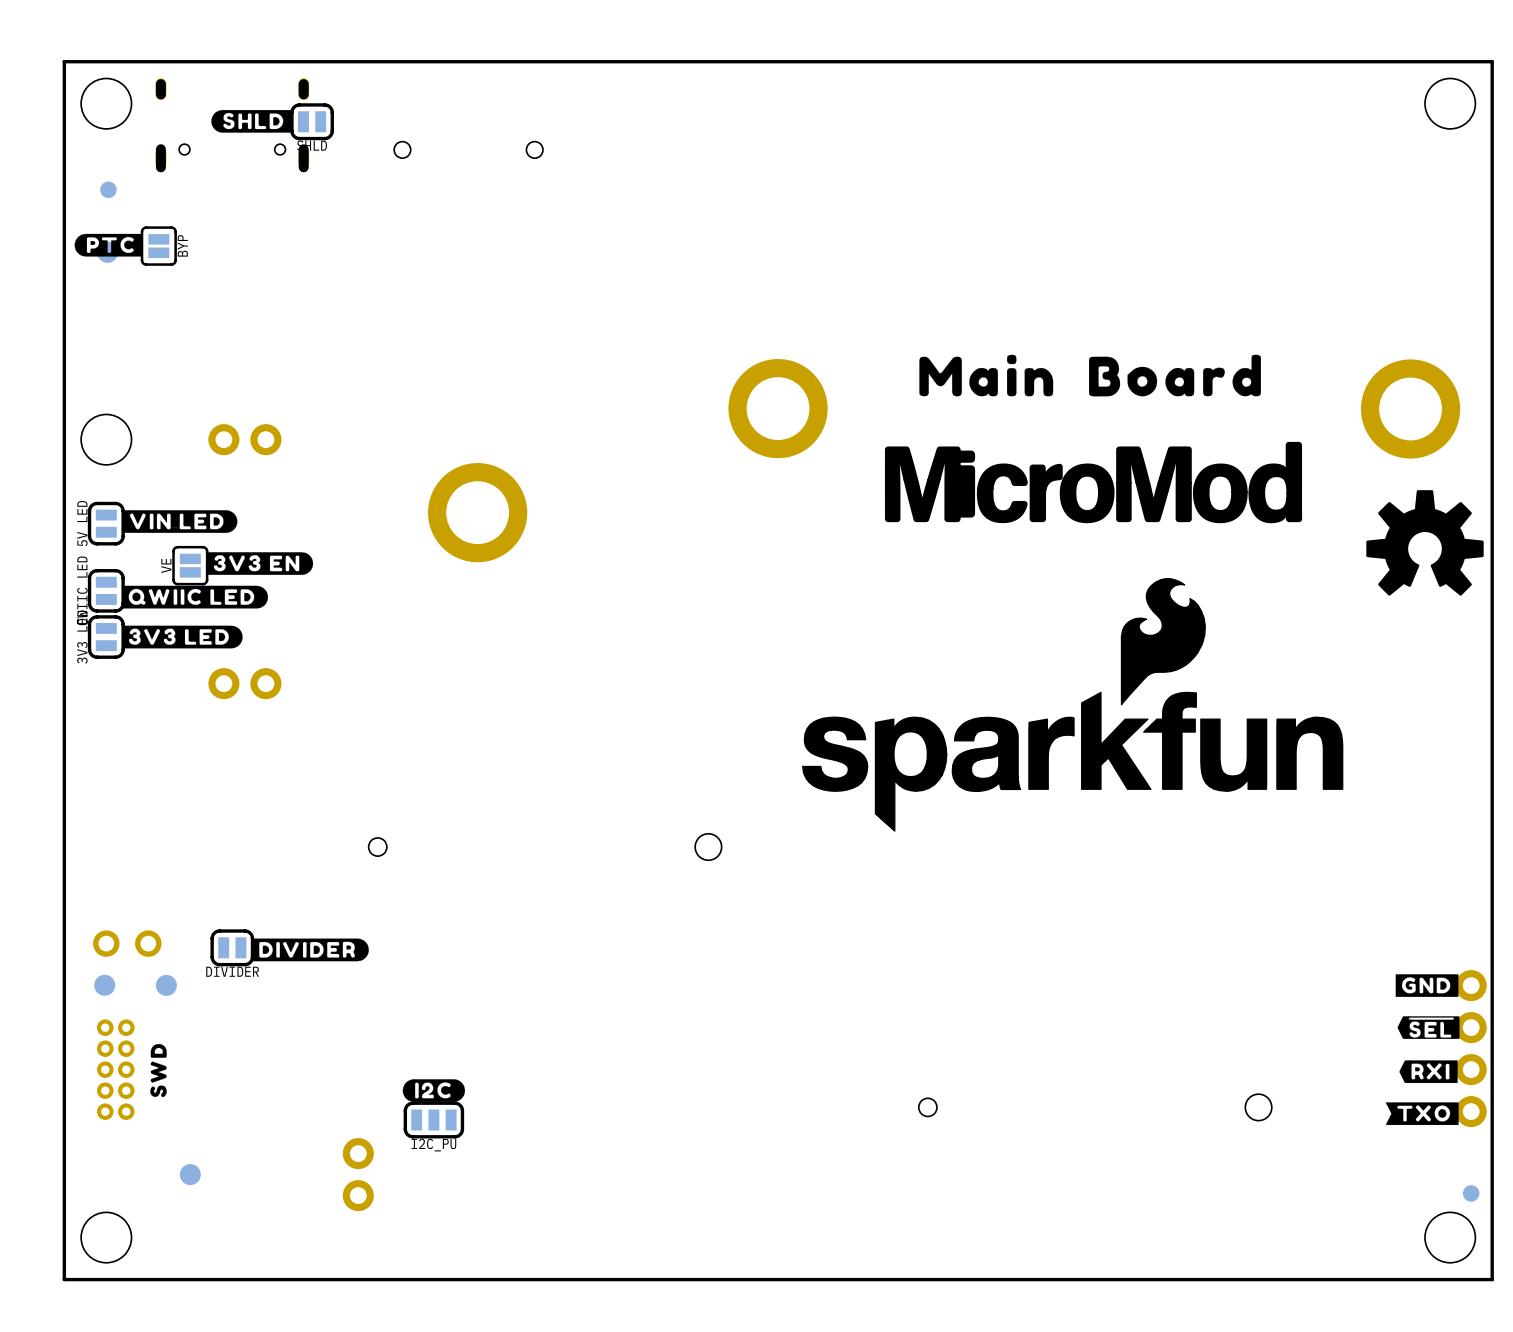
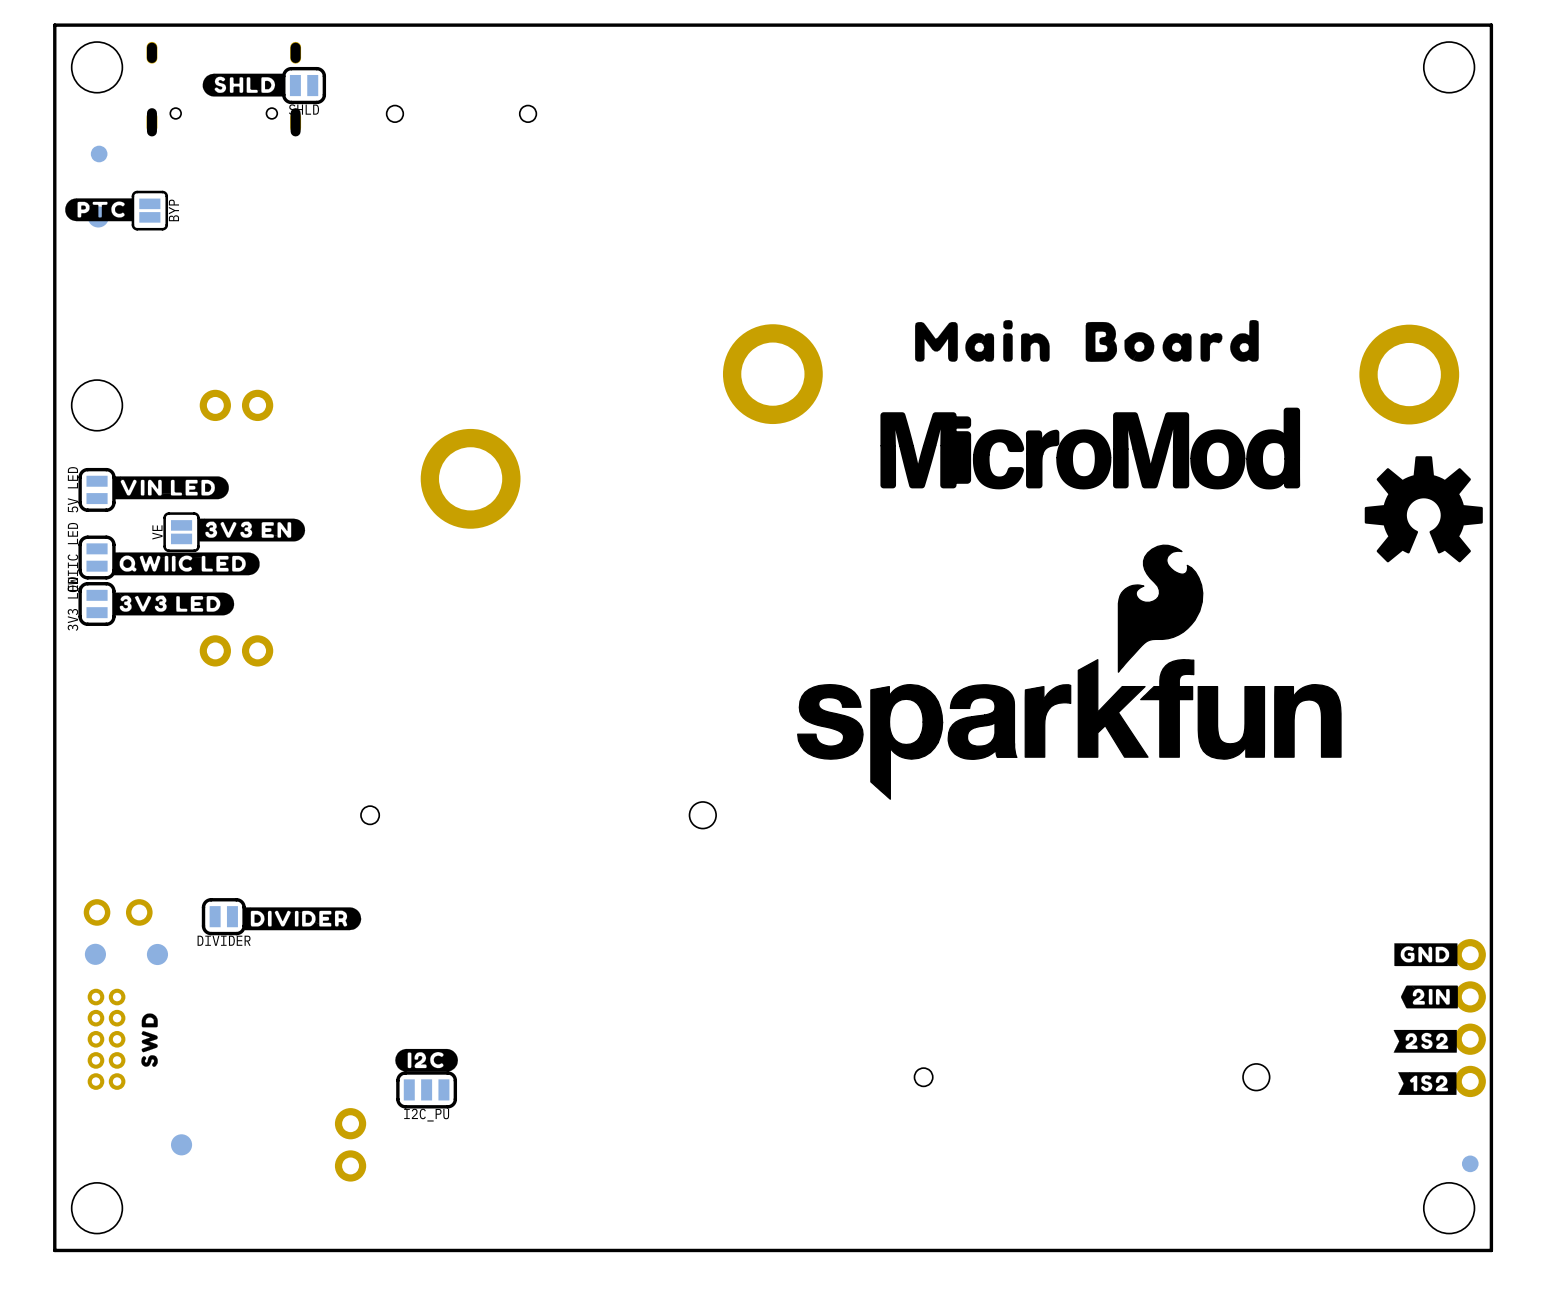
drawing shape: [1397, 1016, 1460, 1039] -> [1401, 985, 1458, 1009]
drawing shape: [1399, 1060, 1458, 1084] -> [1393, 1029, 1457, 1053]
drawing shape: [1385, 1102, 1459, 1126] -> [1398, 1072, 1457, 1095]

